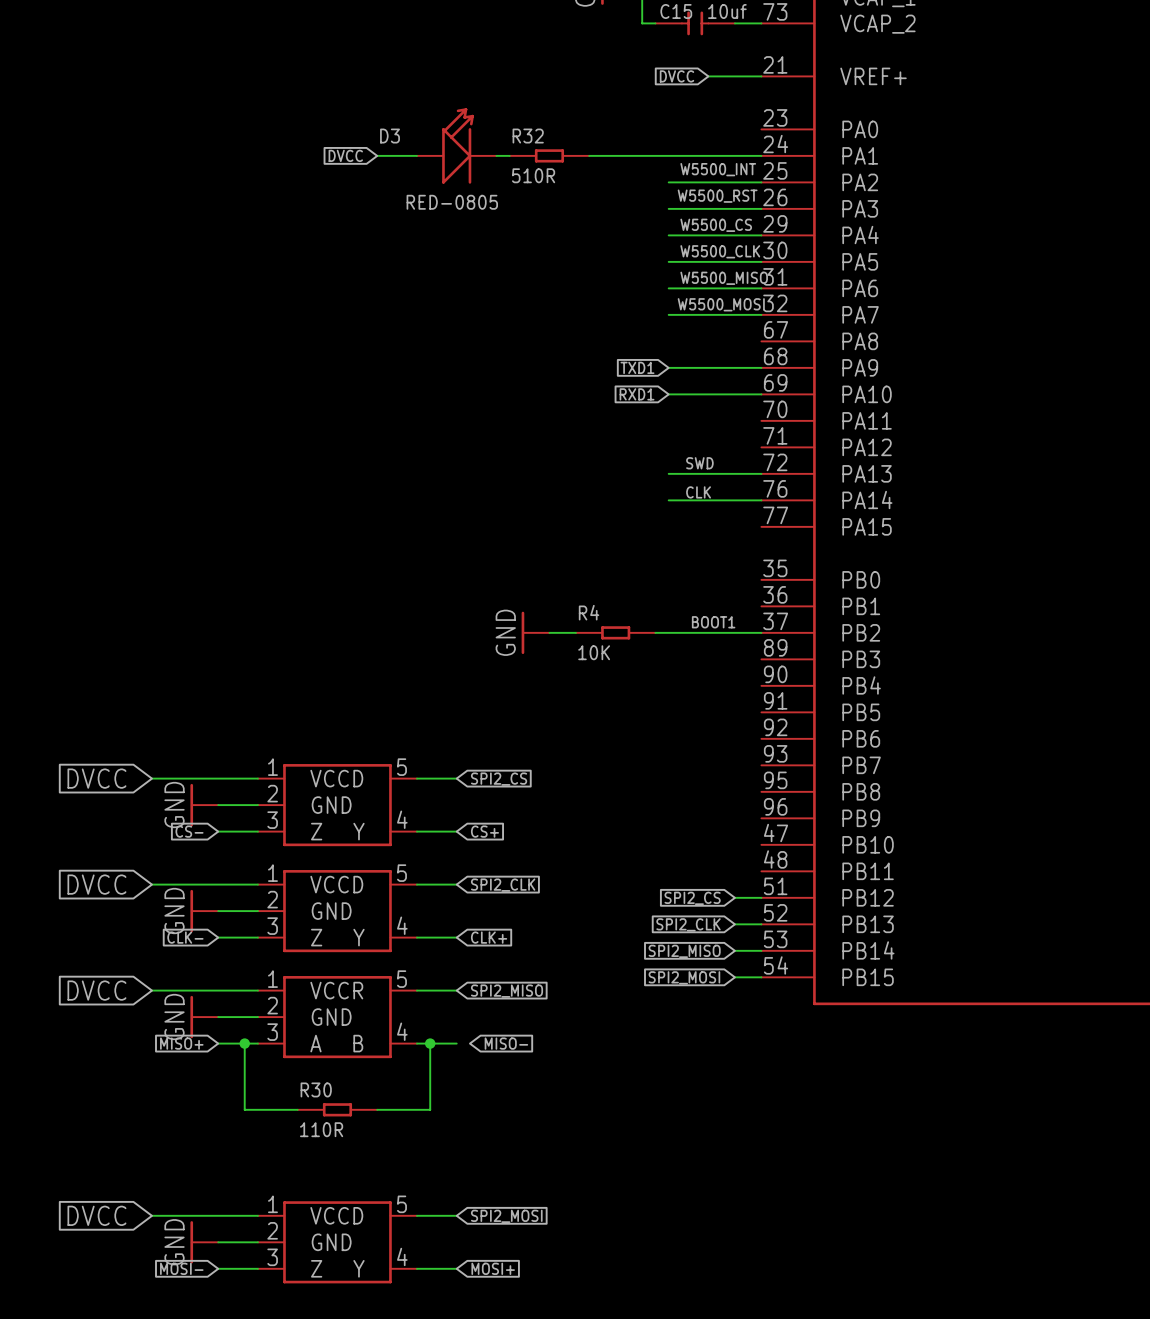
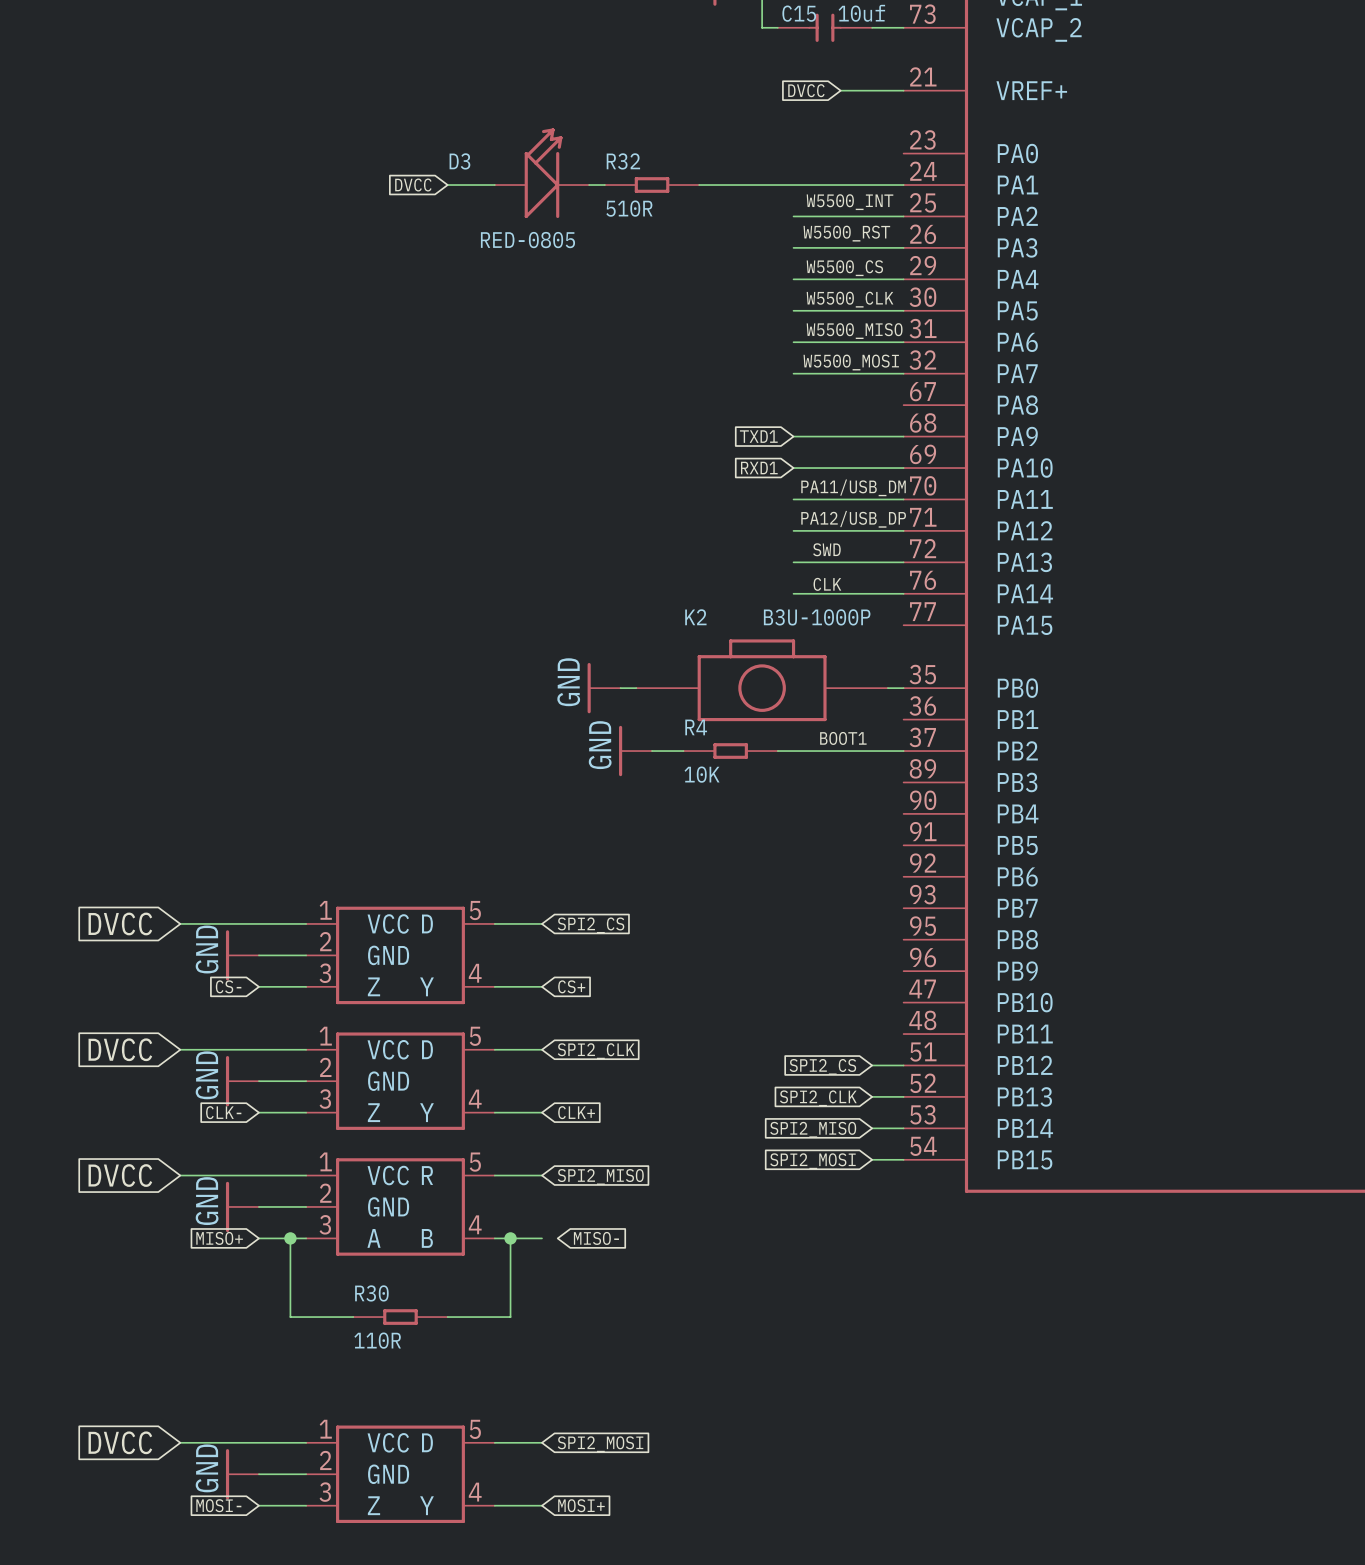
label: none -> PA11/USB_DM (853, 487)
wire: none -> (793, 499) (903, 499)
label: none -> PA12/USB_DP (853, 519)
wire: none -> (793, 530) (903, 530)
K2: none -> B3U-1000P (762, 680)
power symbol: none -> GND (604, 688)
wire: none -> (620, 688) (636, 688)
wire: none -> (887, 688) (903, 688)

